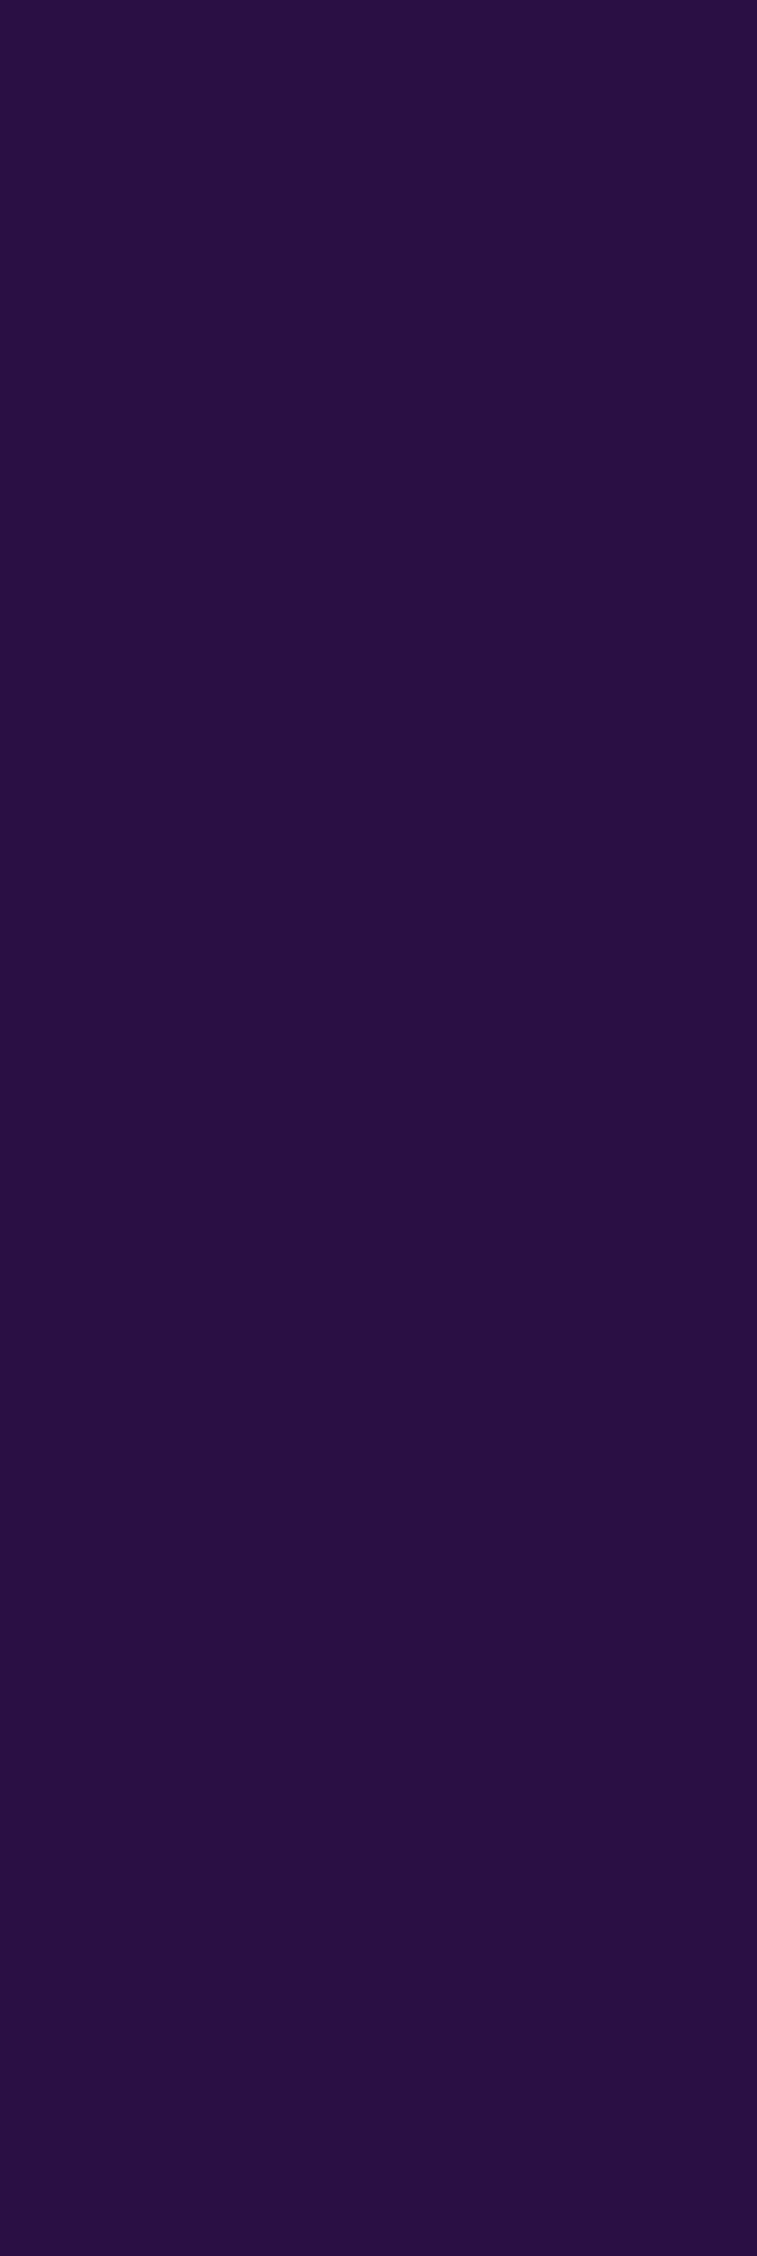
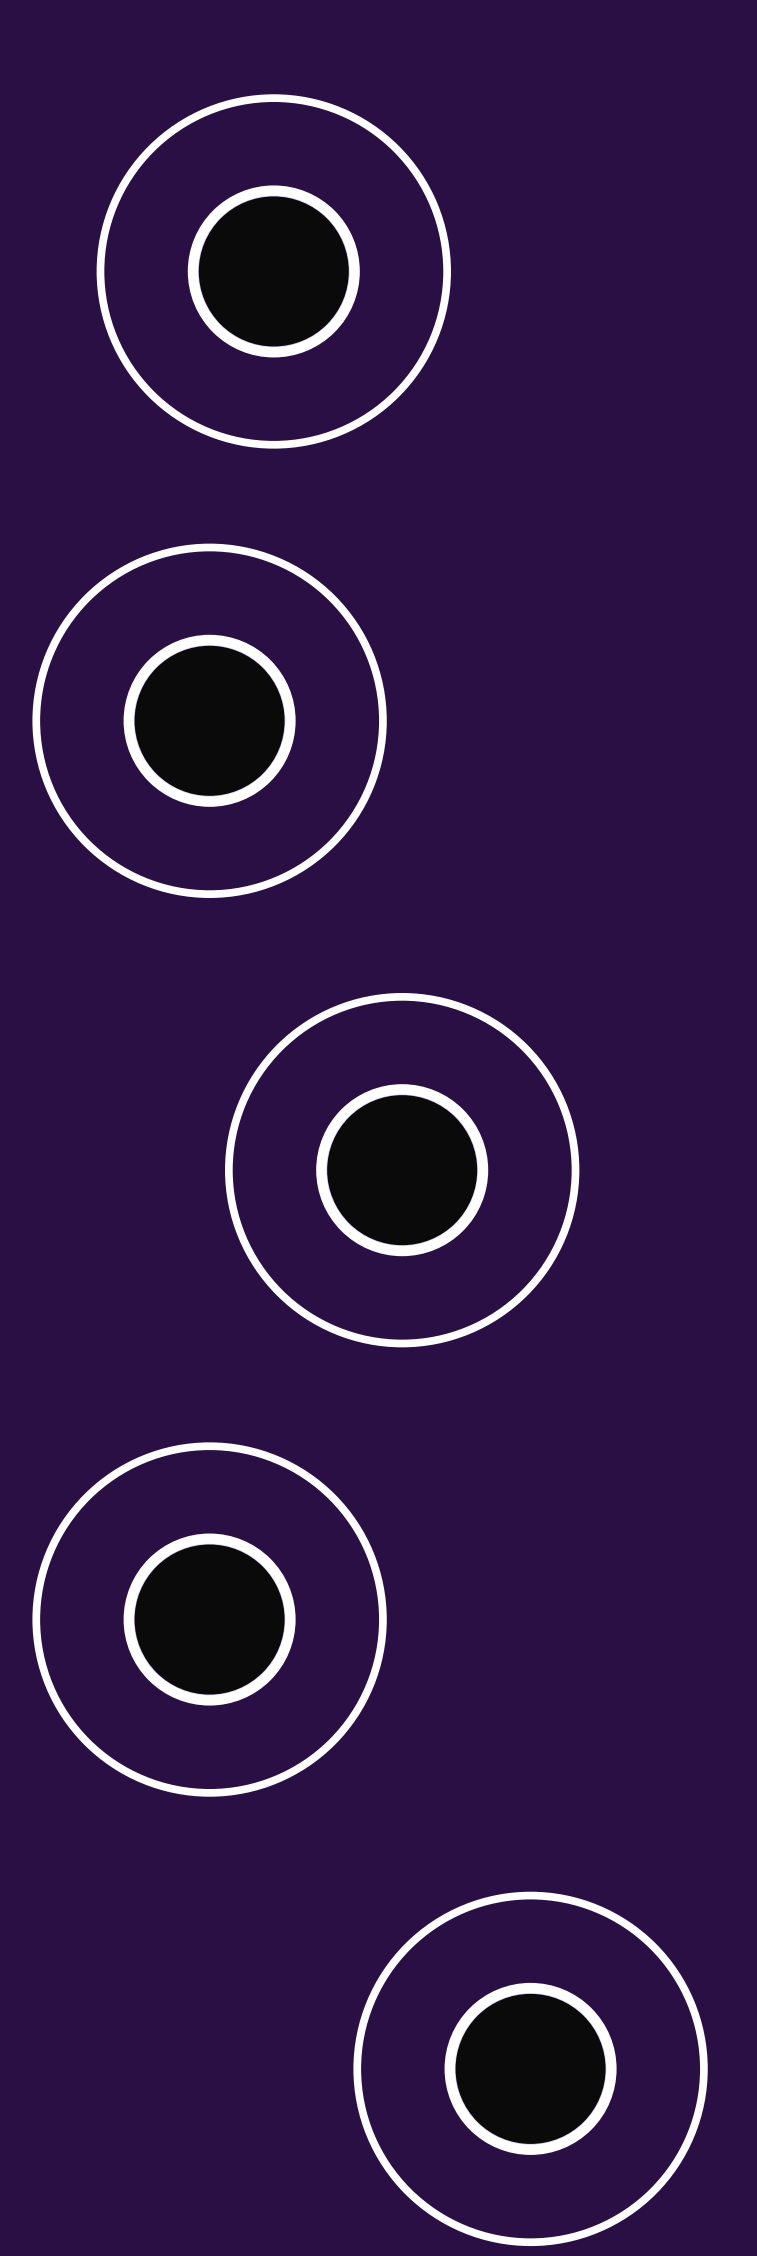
part: none -> (273, 271)
part: none -> (209, 720)
part: none -> (402, 1170)
part: none -> (209, 1619)
part: none -> (530, 2068)

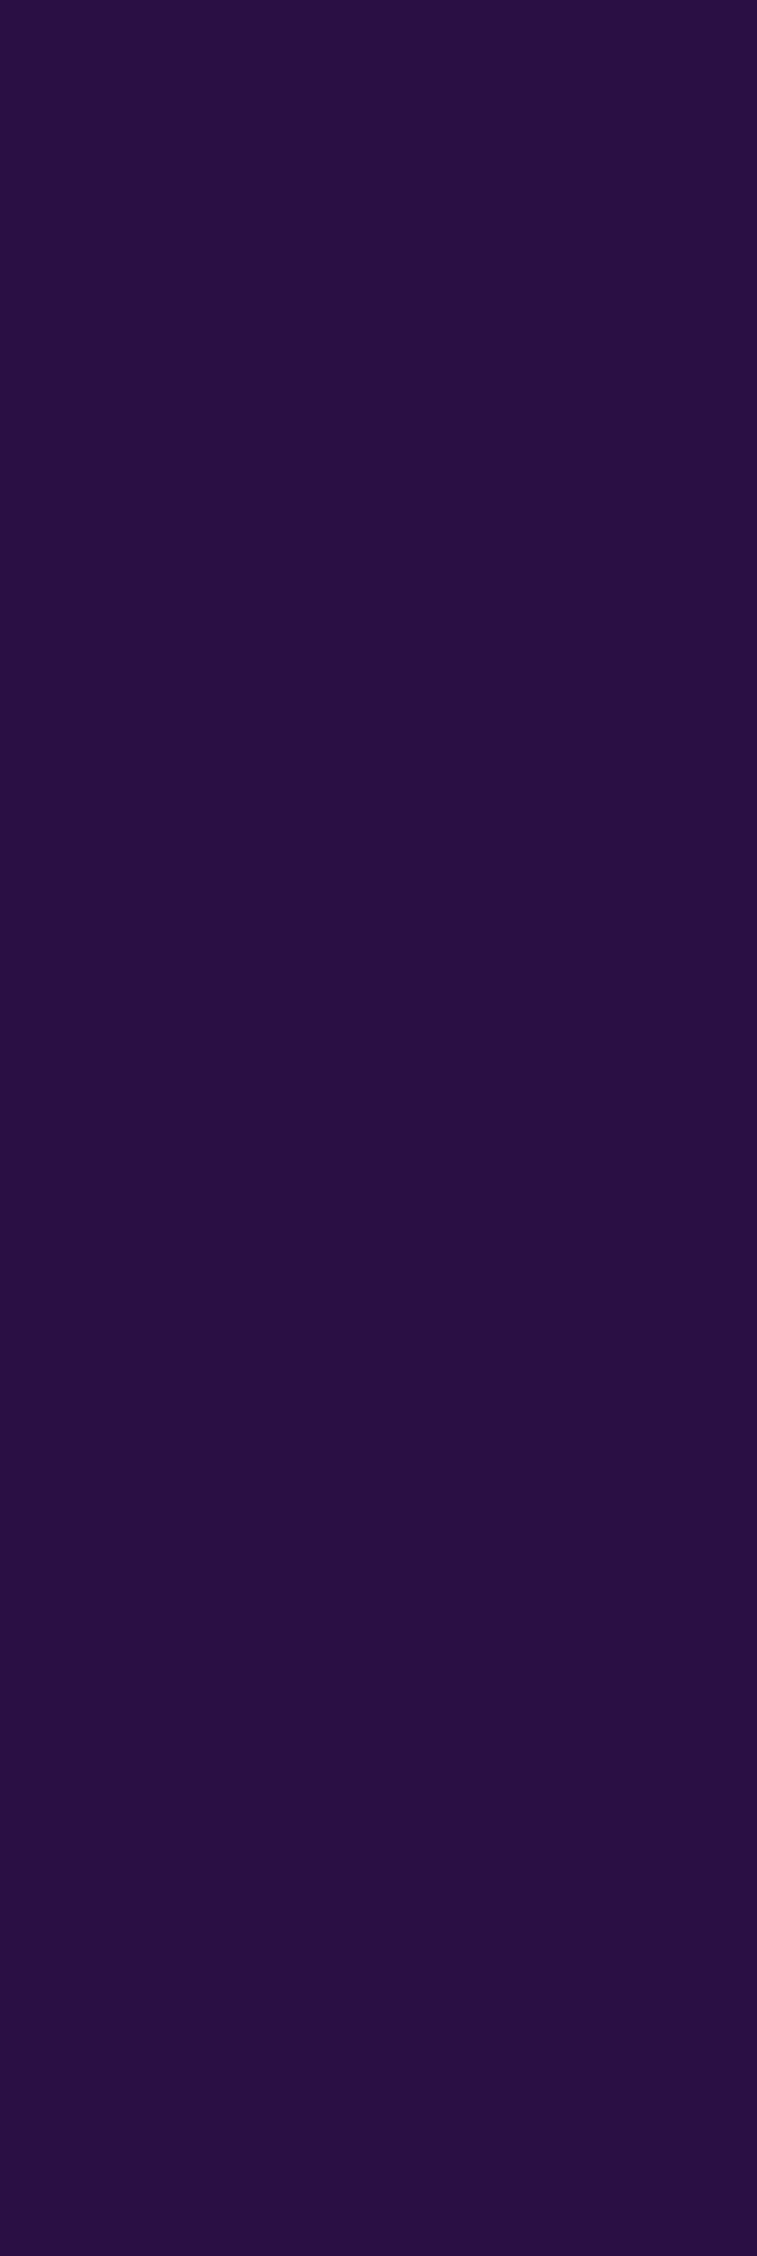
part: (273, 271) -> none
part: (209, 720) -> none
part: (402, 1170) -> none
part: (209, 1619) -> none
part: (530, 2068) -> none

